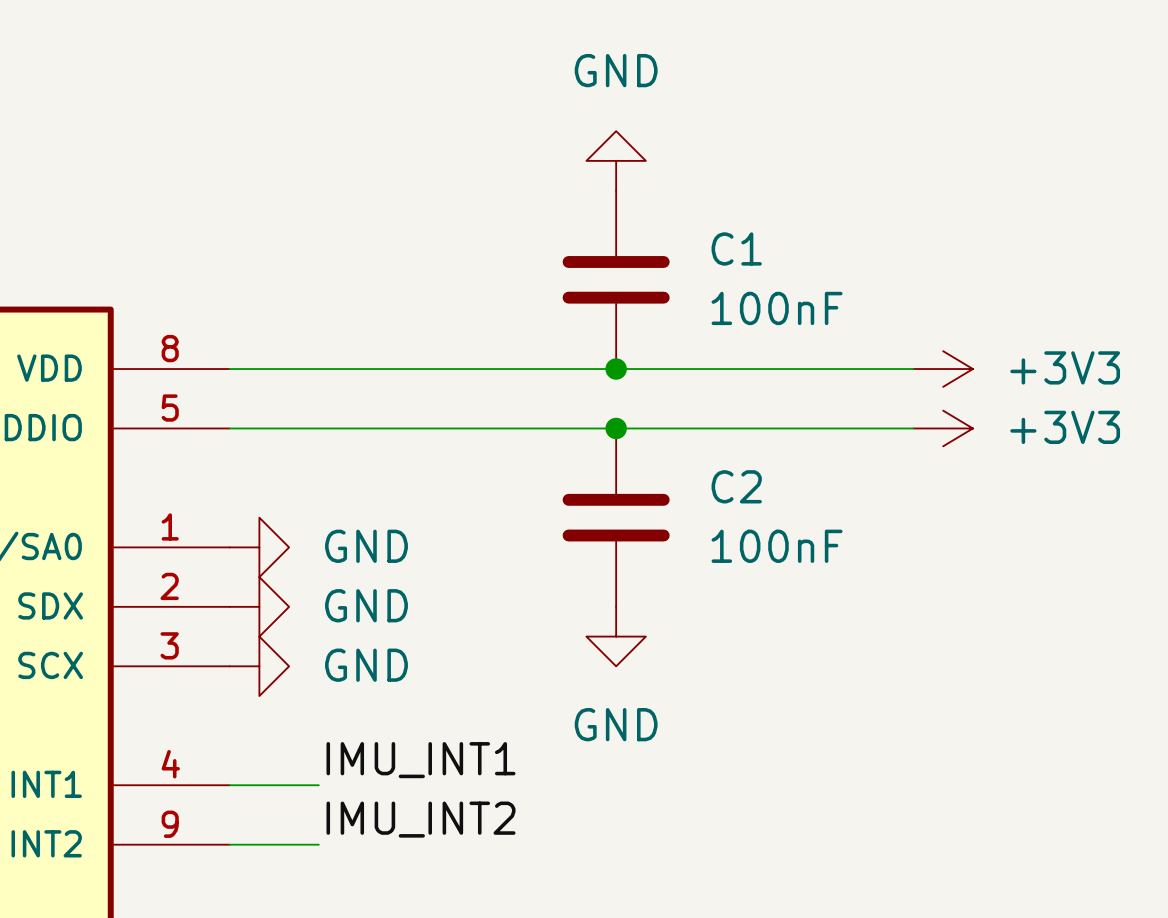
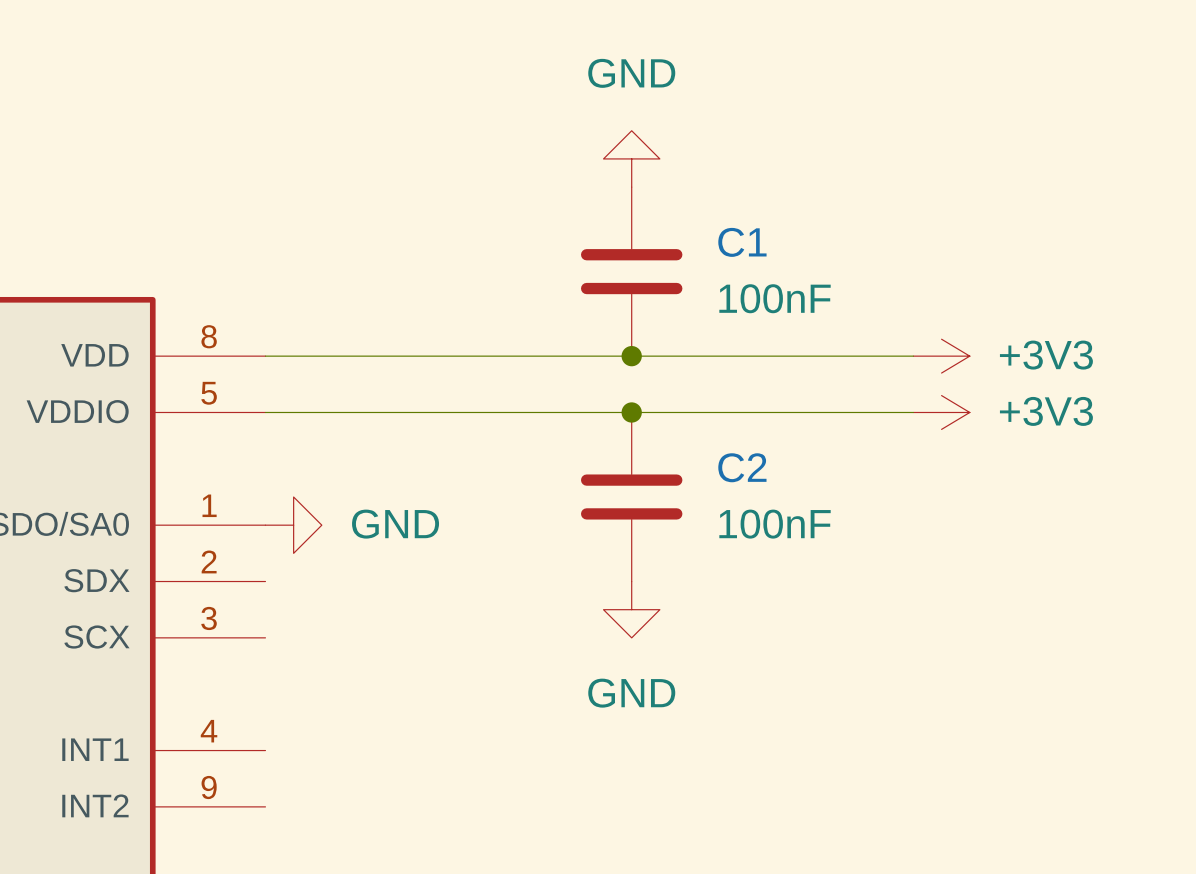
power symbol: GND (259, 606) -> none
power symbol: GND (259, 666) -> none
label: IMU_INT1 (421, 760) -> none
wire: (229, 785) (318, 785) -> none
label: IMU_INT2 (421, 819) -> none
wire: (229, 844) (318, 844) -> none

